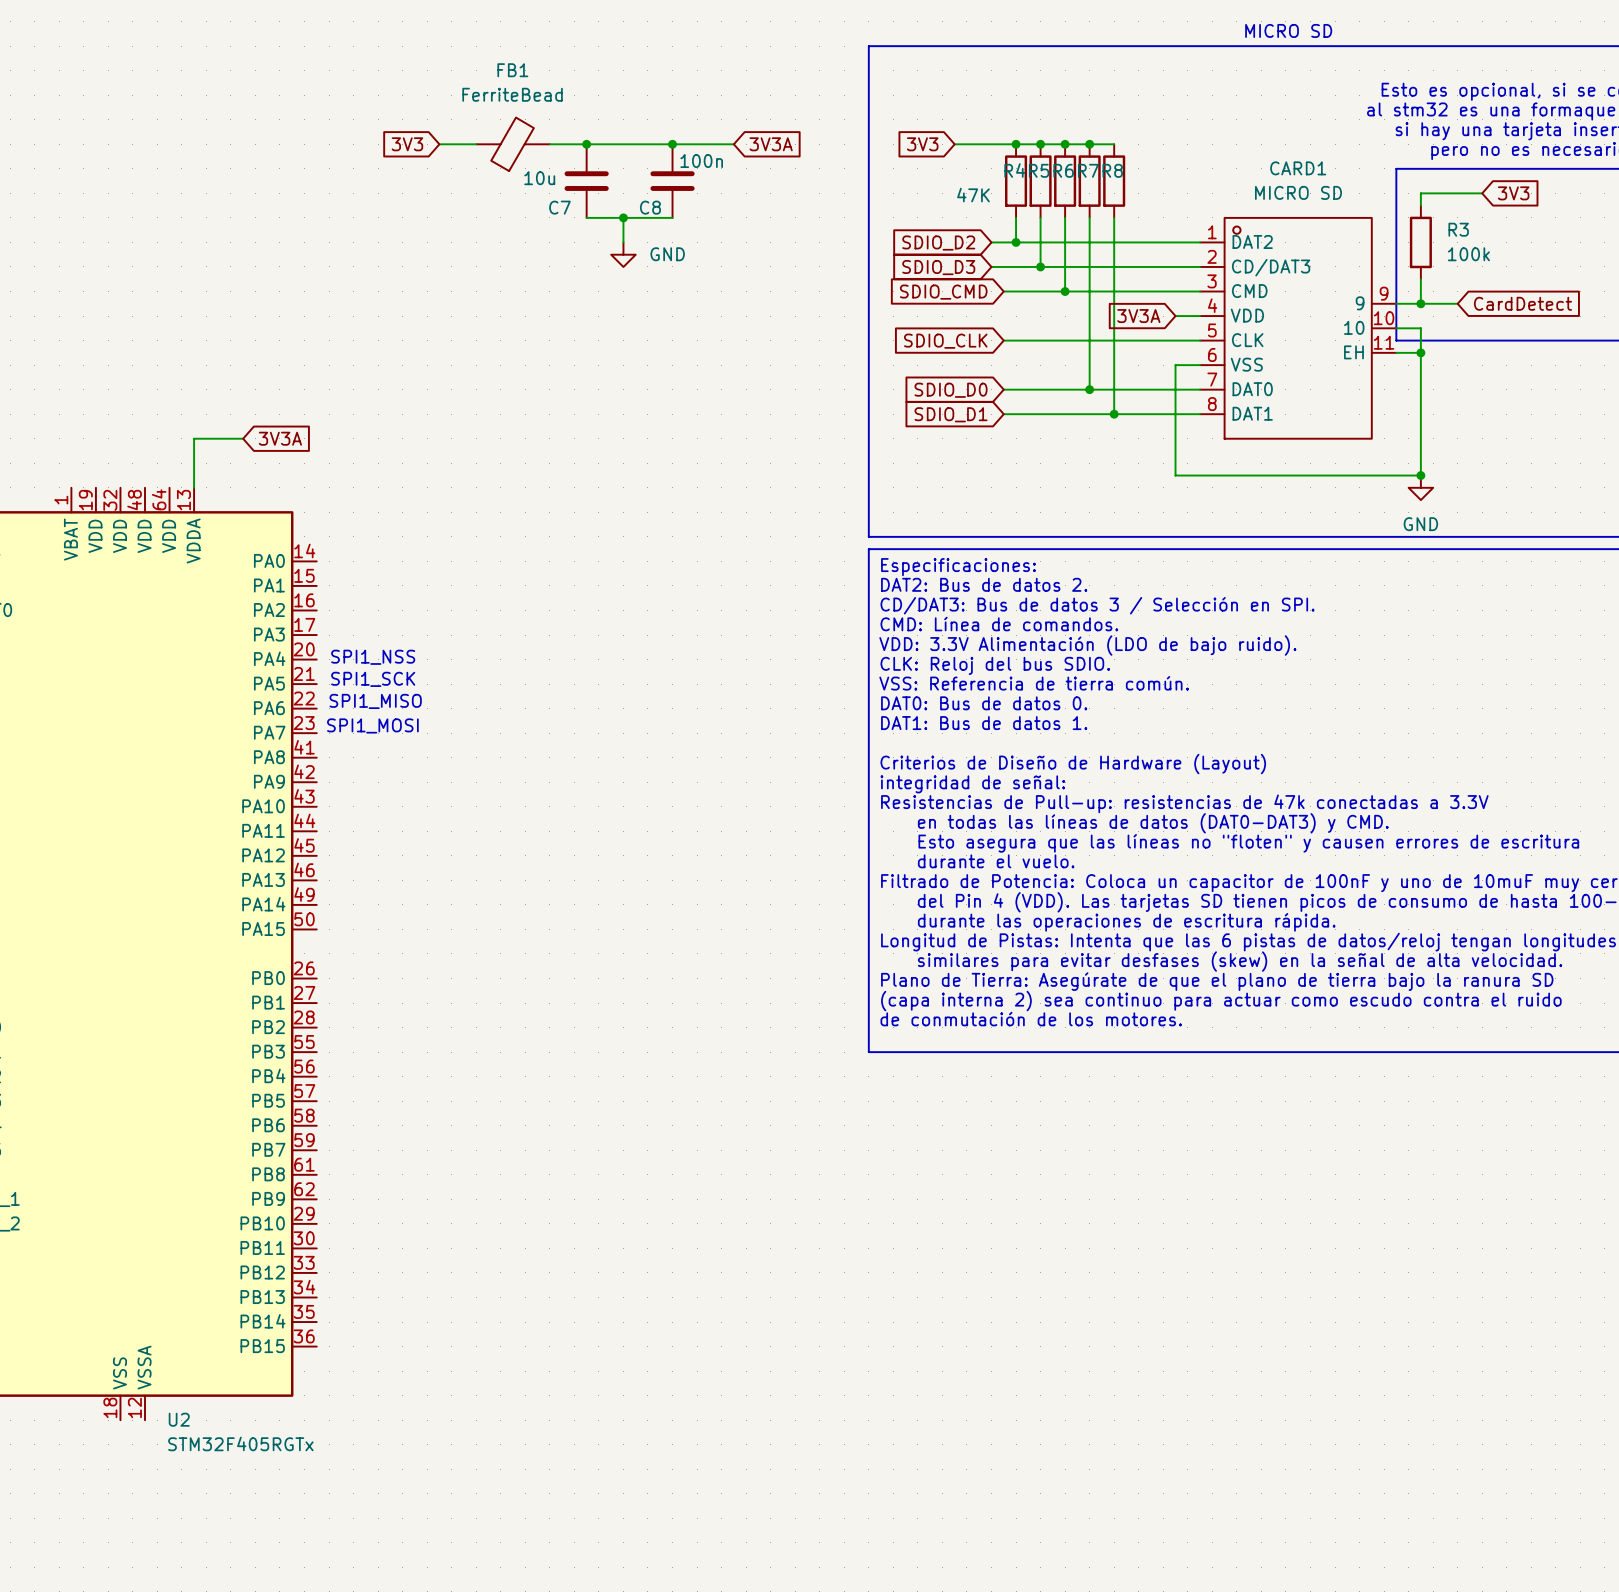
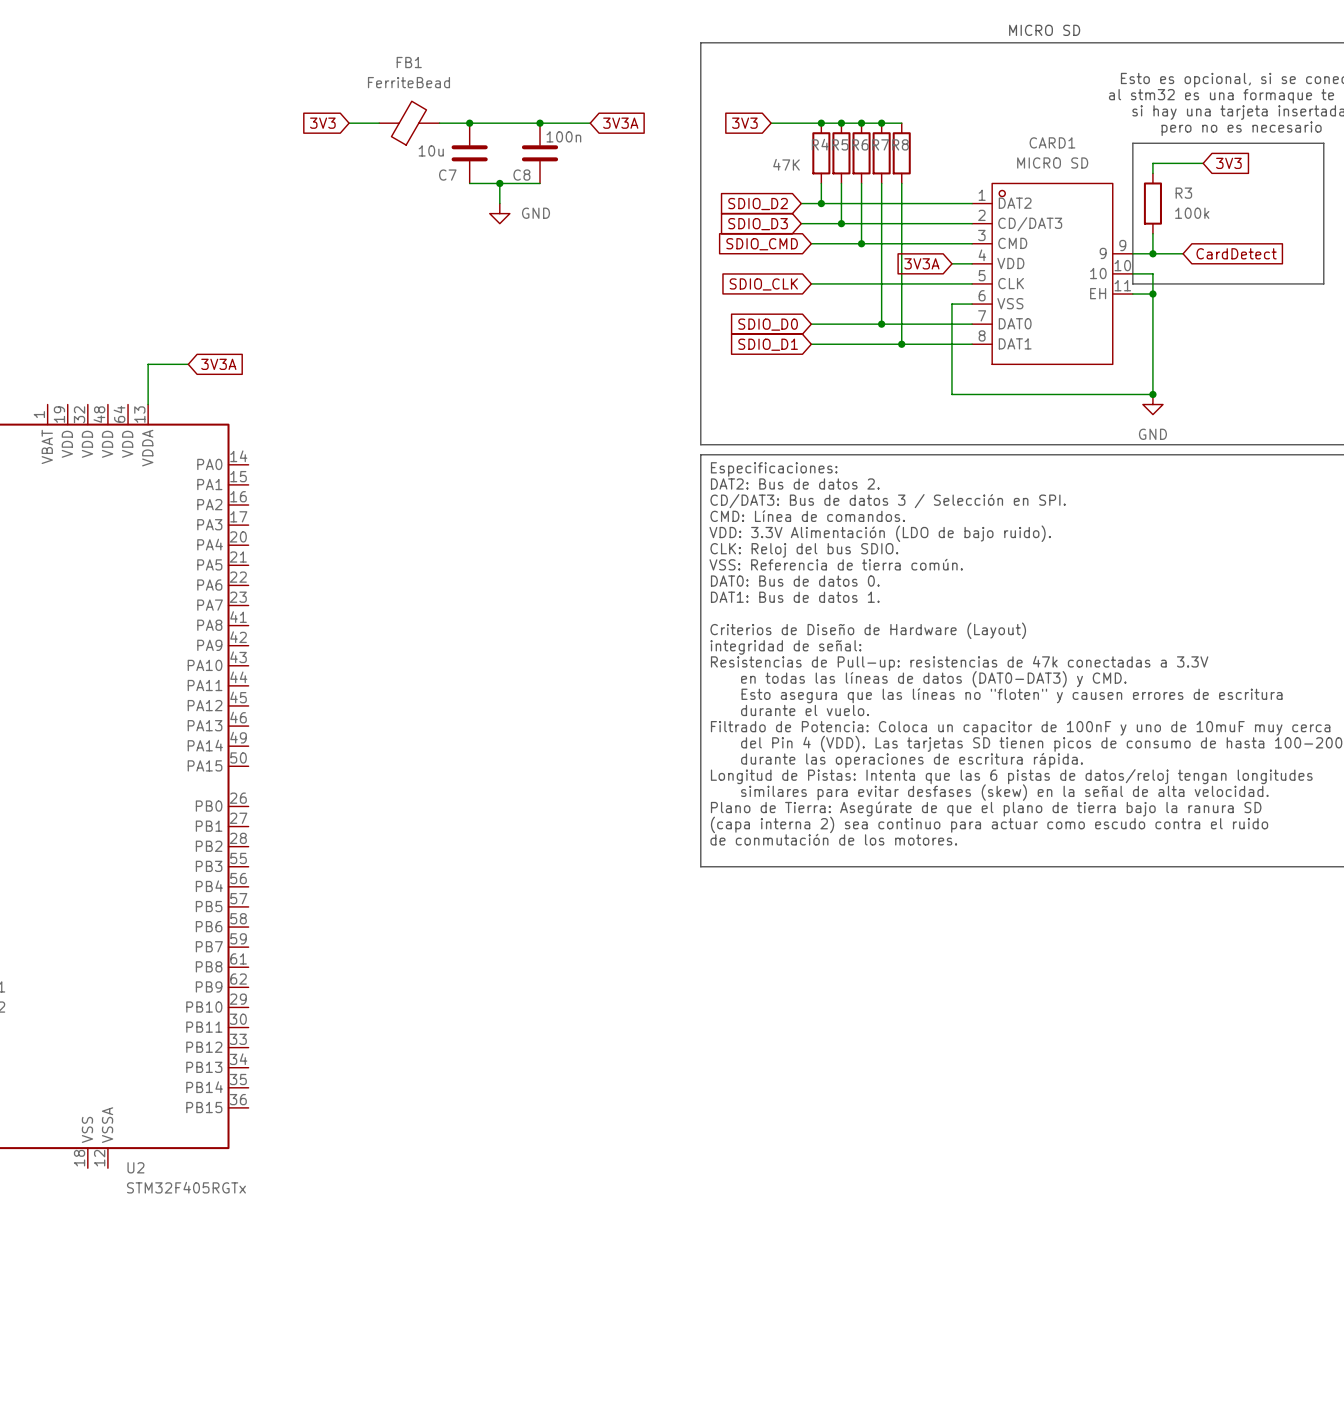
text: SPI1_NSS (373, 657) -> none
text: SPI1_SCK (373, 679) -> none
text: SPI1_MISO (375, 701) -> none
text: SPI1_MOSI (372, 725) -> none

